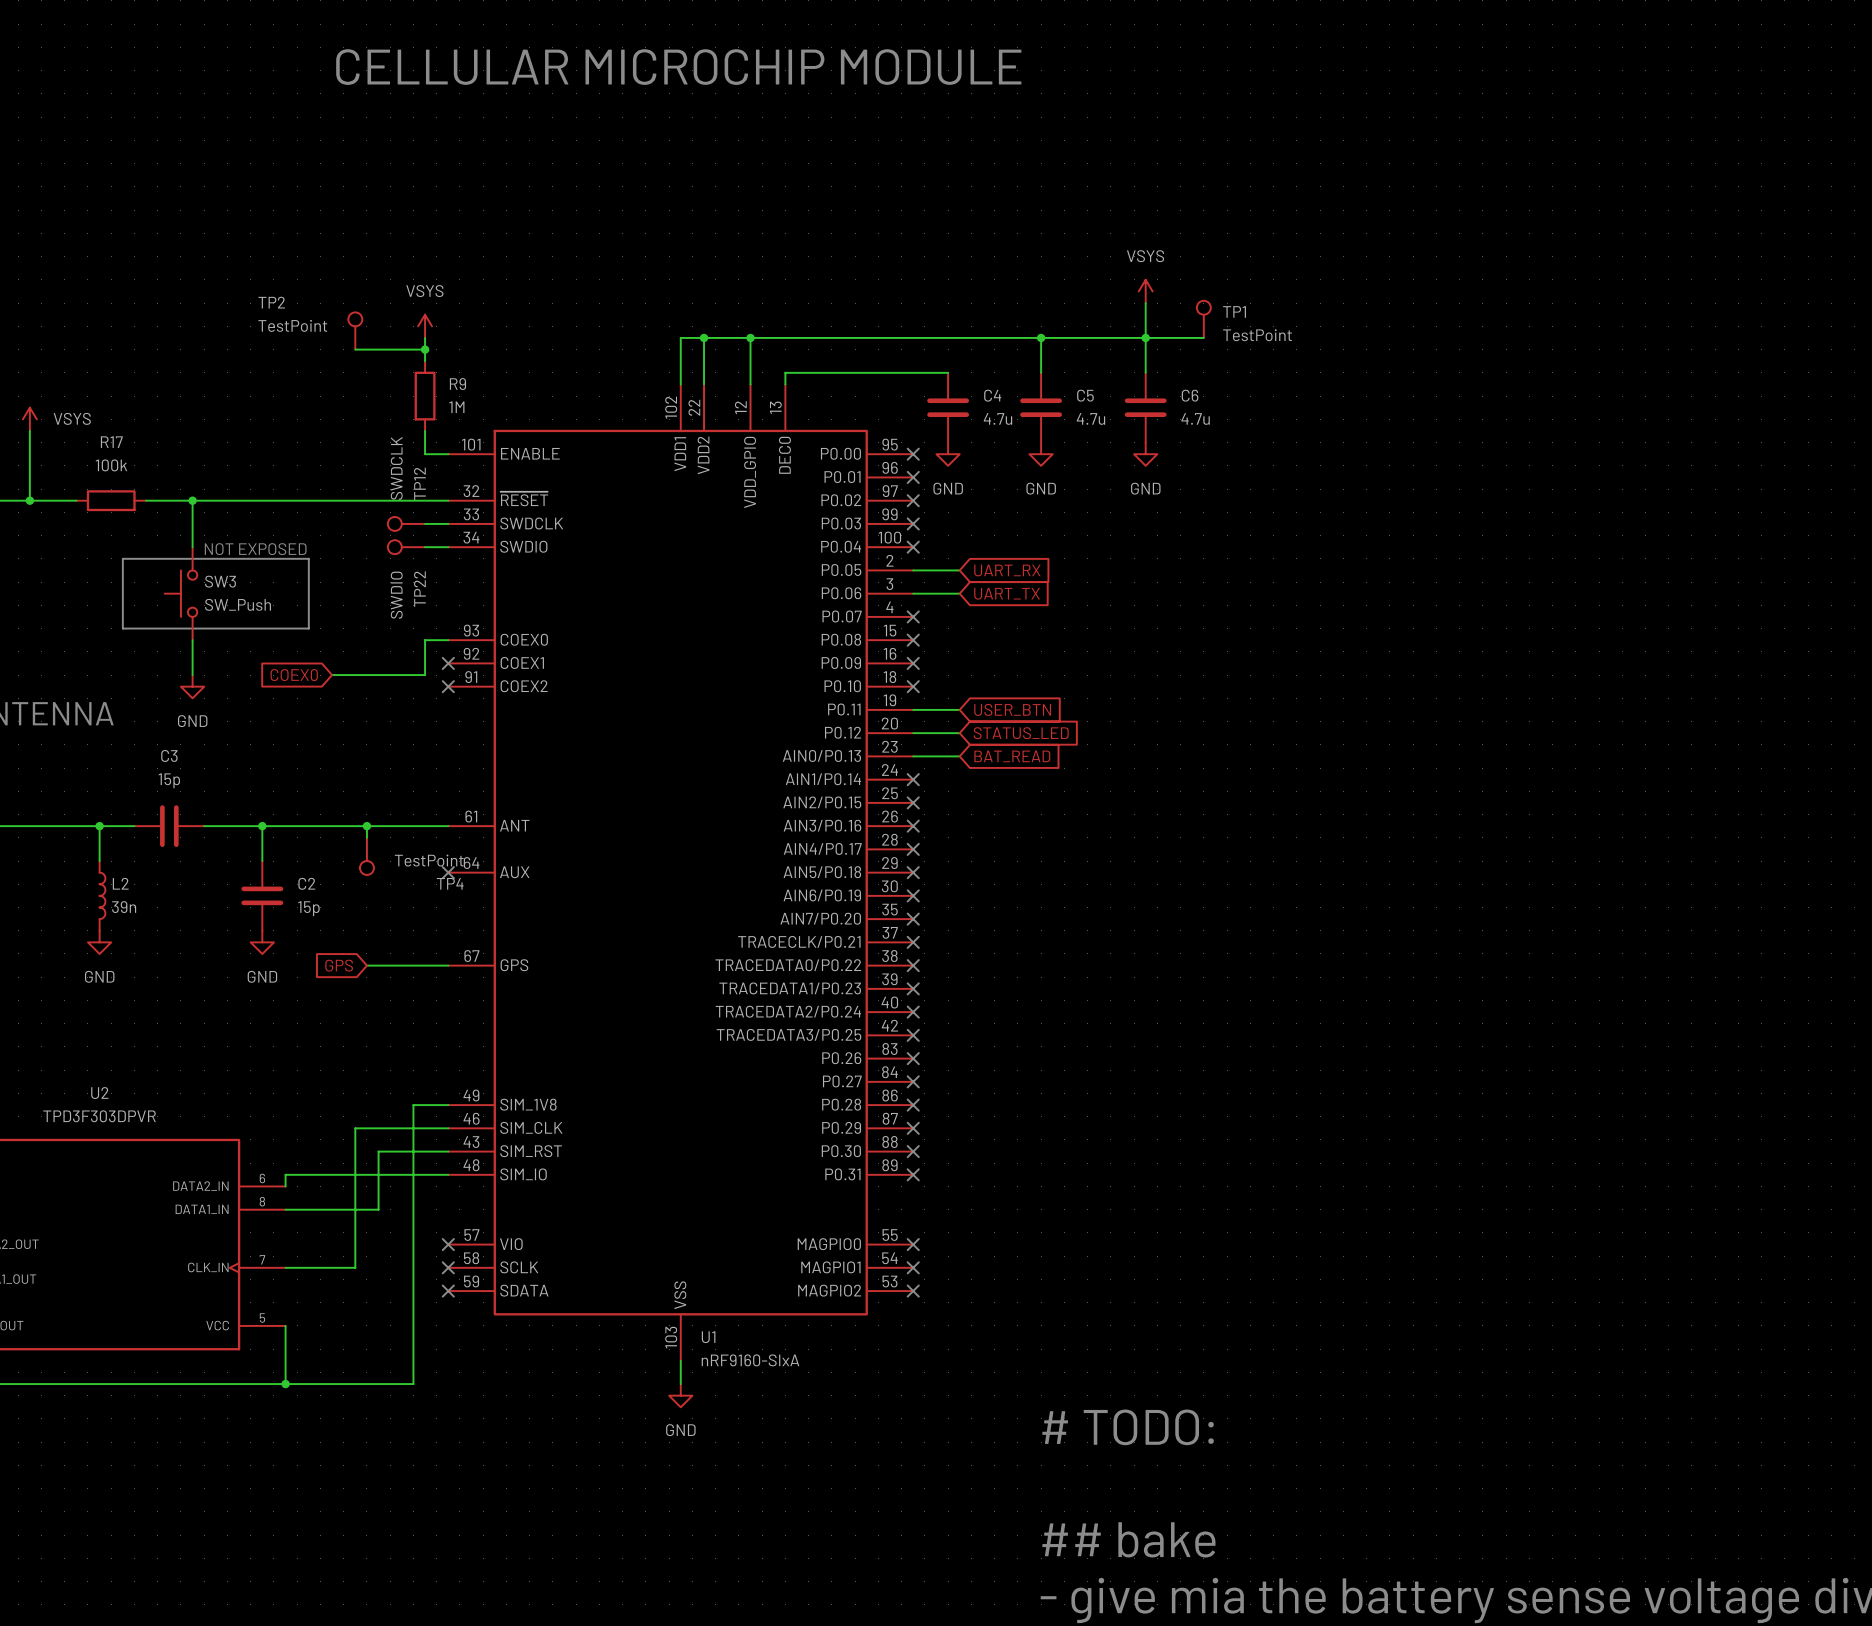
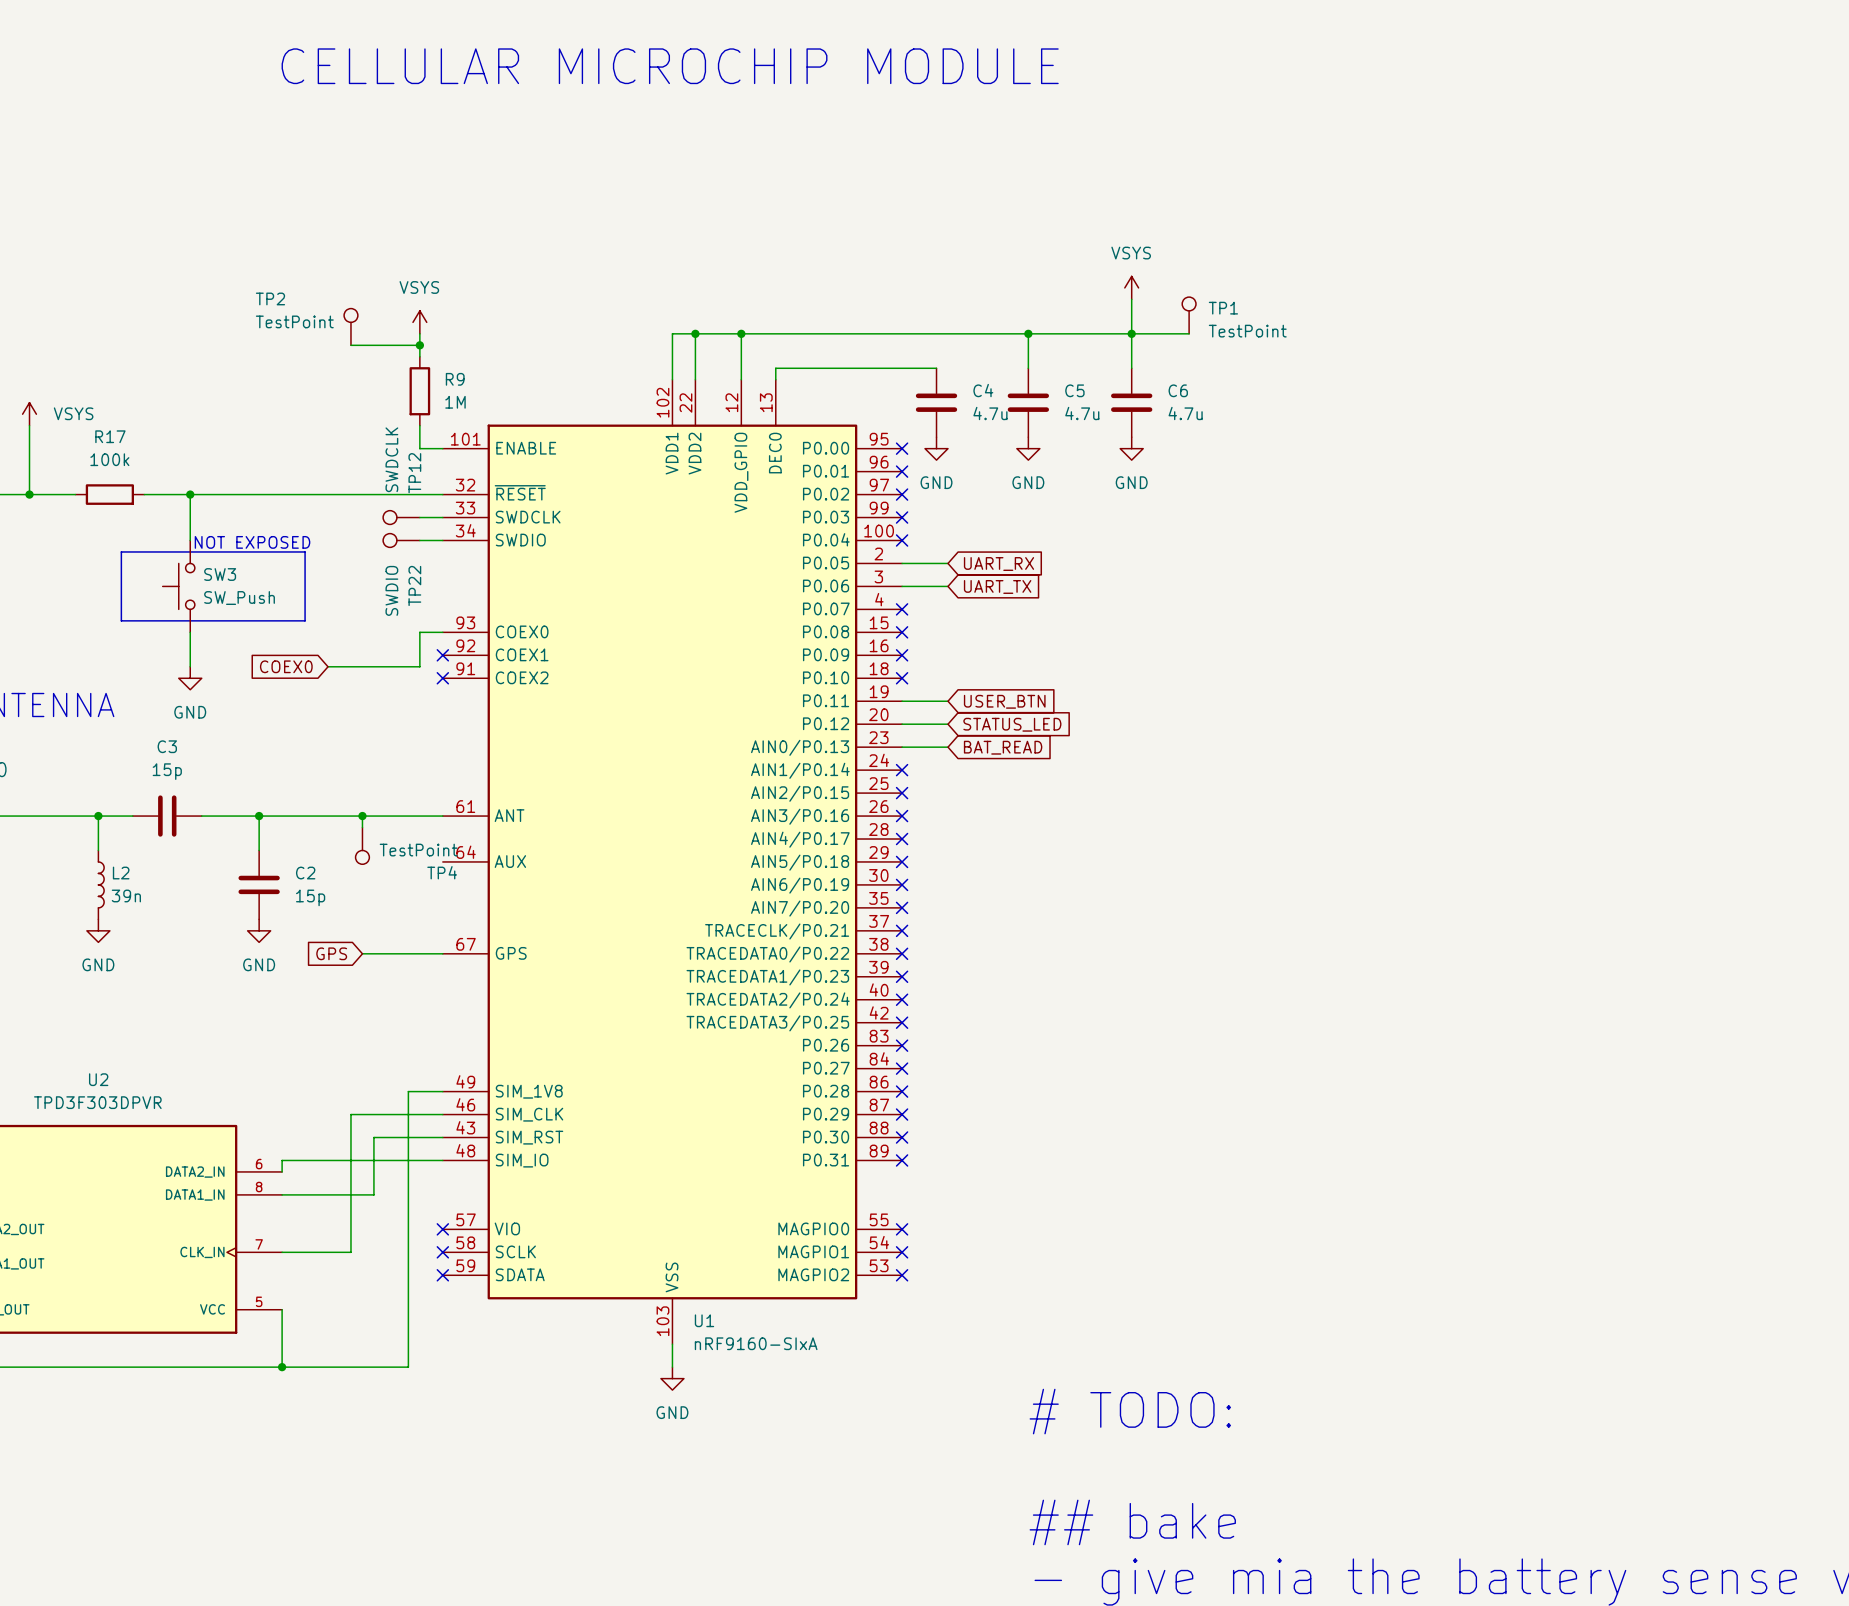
no-connect mark: (448, 872) -> none

